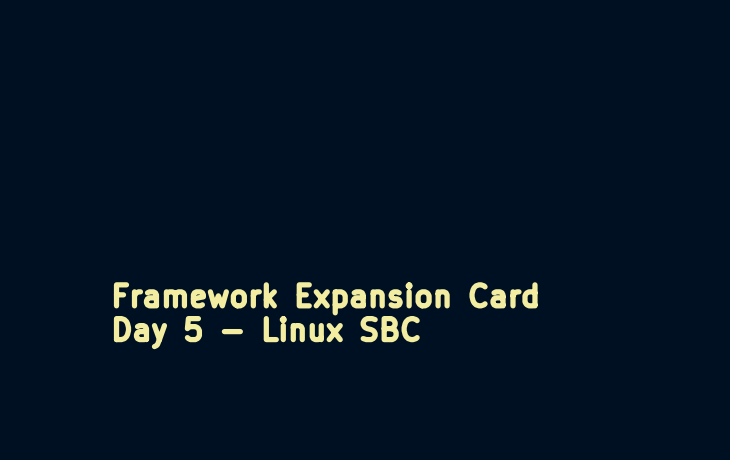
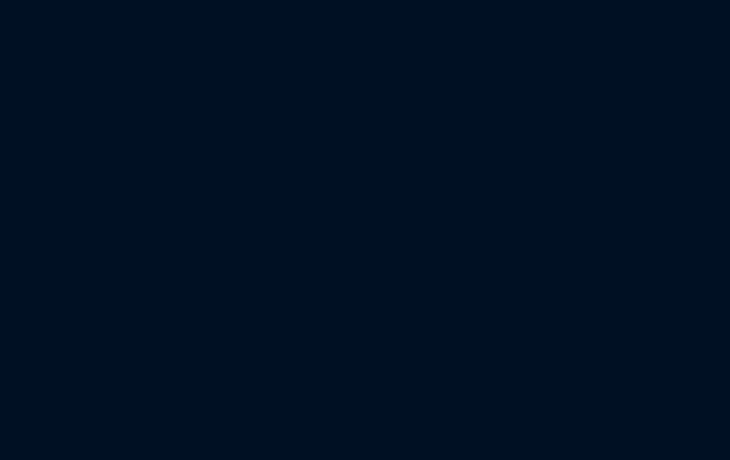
text: Framework Expansion Card (325, 298) -> none
text: Day 5 - Linux SBC (266, 332) -> none

